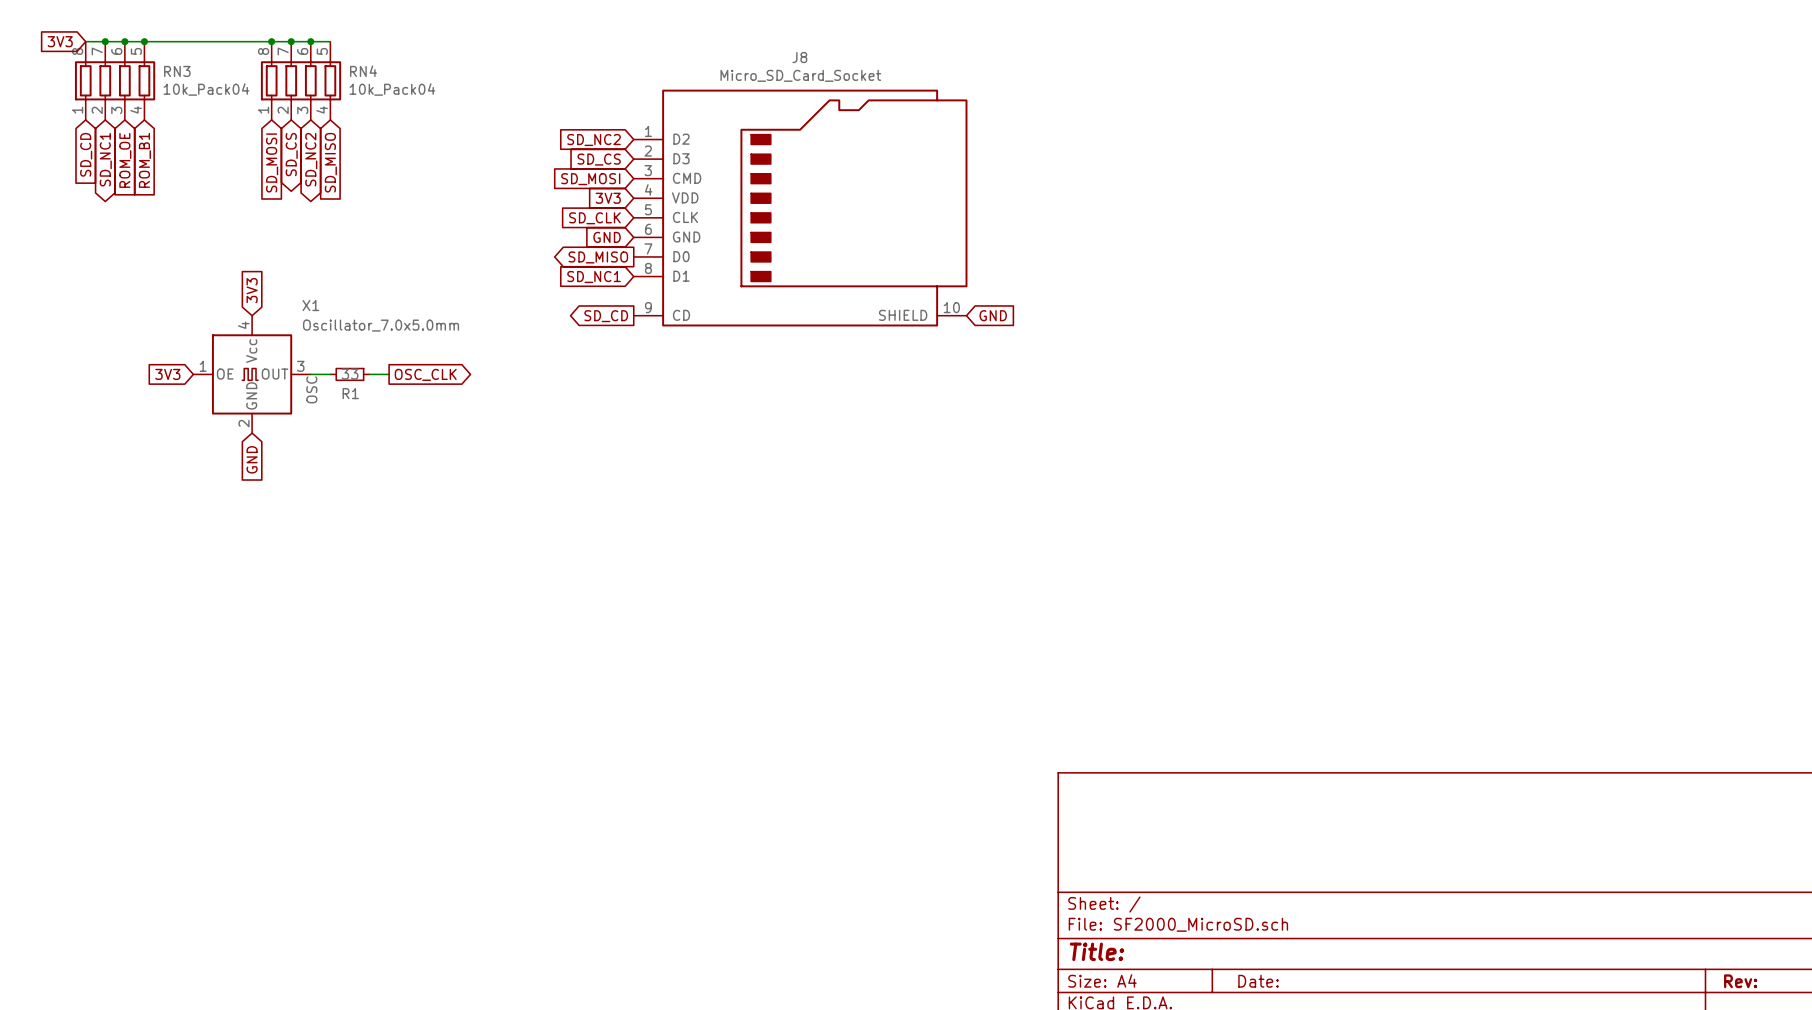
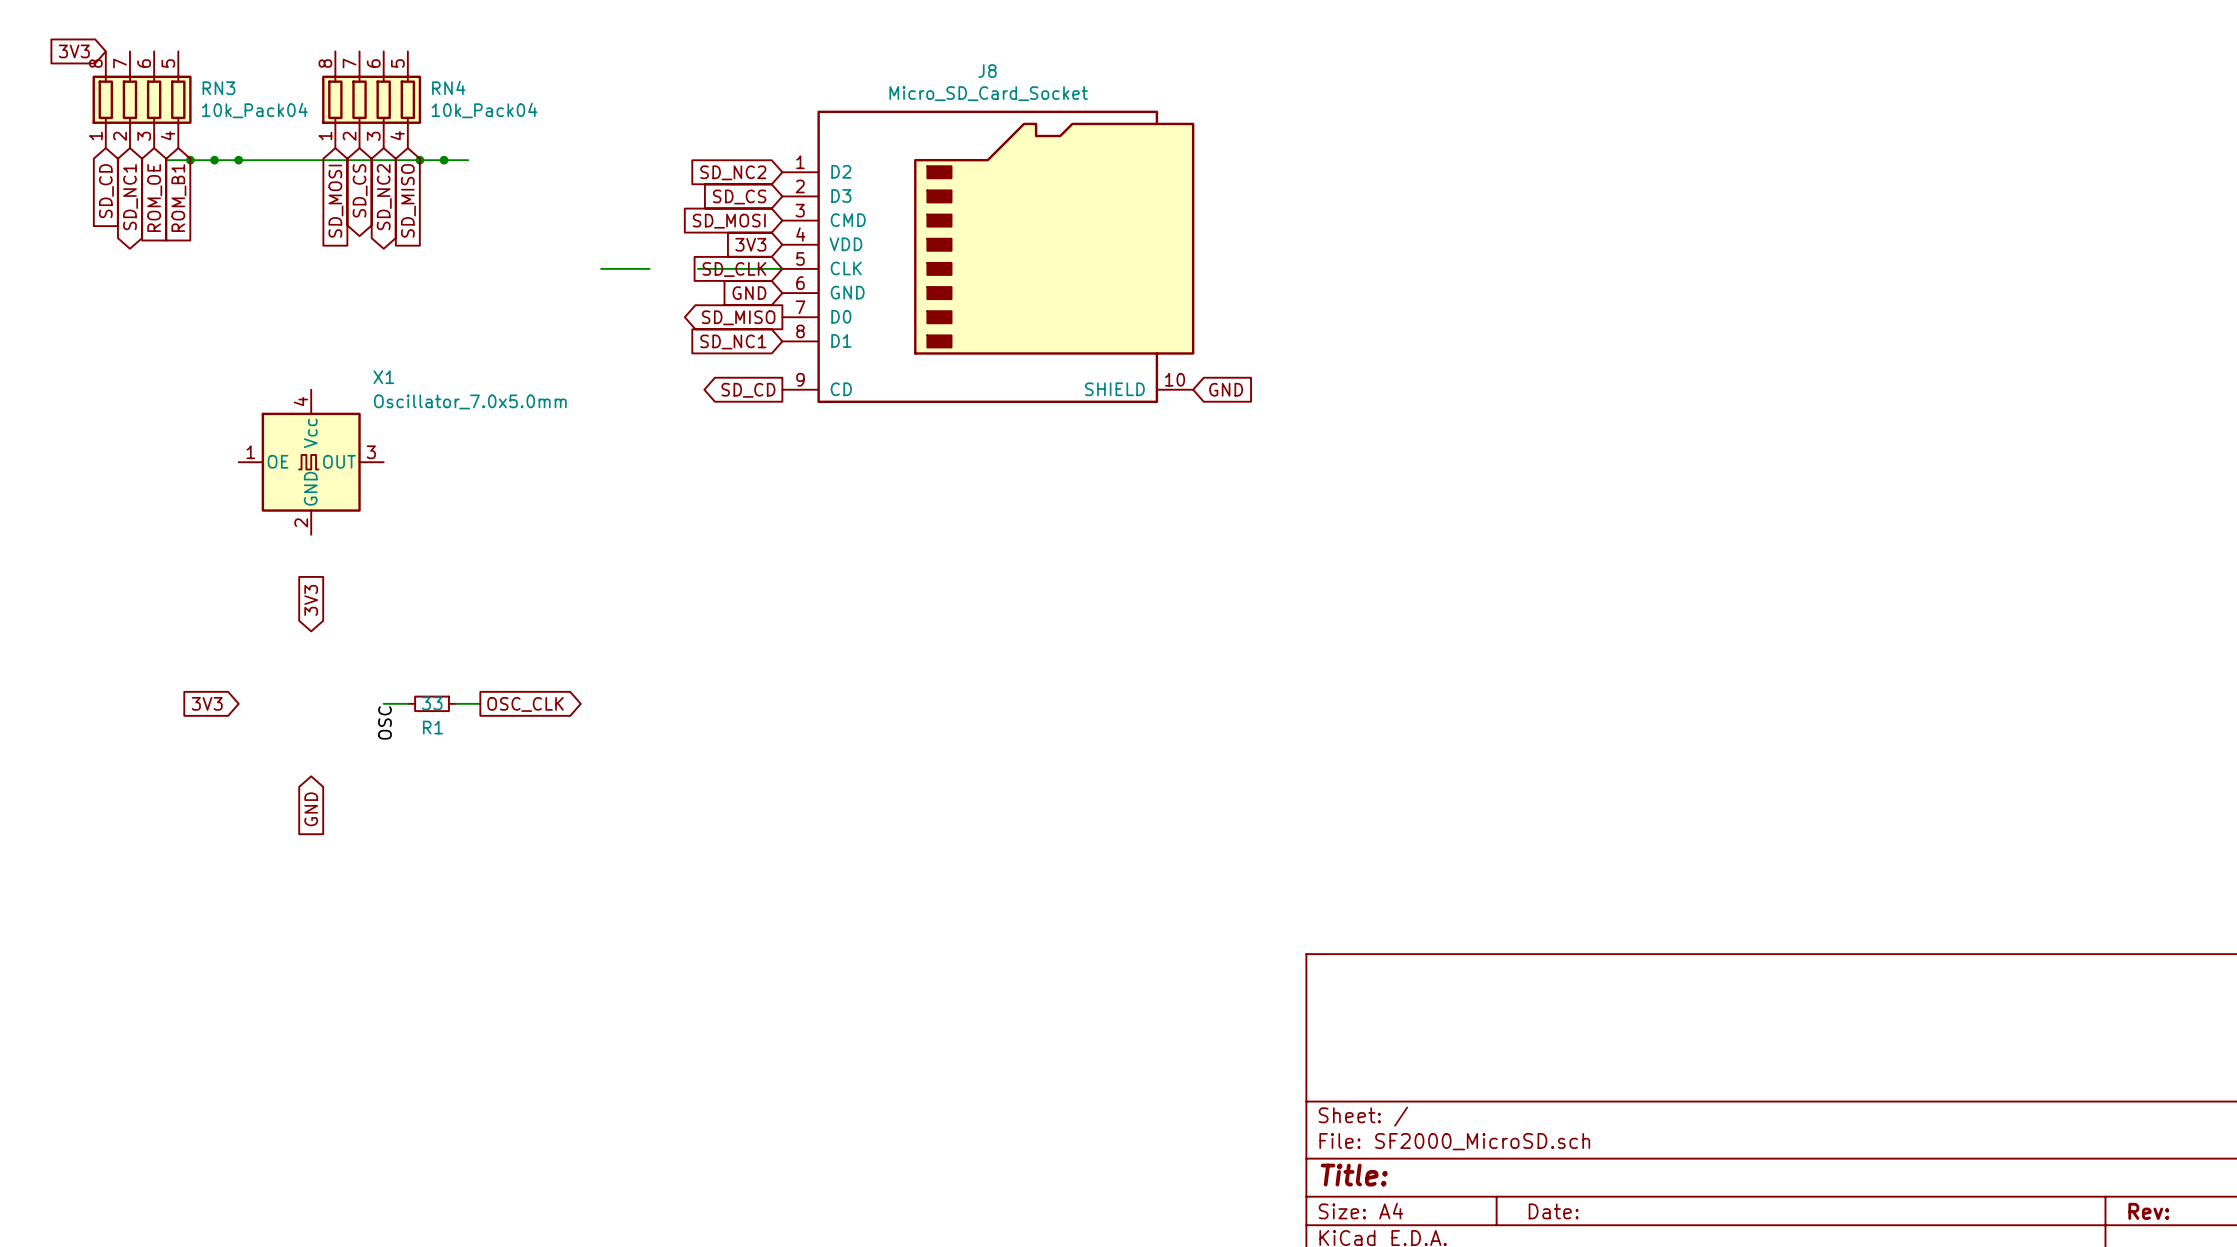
wire: (85, 41) (330, 41) -> (166, 160) (468, 160)
junction: (105, 41) -> none
junction: (124, 41) -> none
junction: (144, 41) -> none
junction: (271, 41) -> none
junction: (291, 41) -> none
junction: (310, 41) -> none
junction: none -> (190, 160)
junction: none -> (214, 160)
junction: none -> (238, 160)
junction: none -> (419, 160)
junction: none -> (444, 160)
wire: none -> (601, 268) (649, 268)
wire: none -> (697, 268) (782, 268)
global label: 3V3 (252, 290) -> none
global label: 3V3 (167, 374) -> none
wire: (310, 374) (330, 374) -> none
R1 position: (349, 374) -> (432, 703)
wire: (369, 374) (389, 374) -> none
global label: OSC_CLK (425, 374) -> none
label: OSC (311, 389) -> none
global label: GND (252, 459) -> none
global label: none -> 3V3 (311, 600)
global label: none -> 3V3 (207, 703)
wire: none -> (383, 703) (407, 703)
wire: none -> (456, 703) (480, 703)
global label: none -> OSC_CLK (525, 704)
label: none -> OSC (384, 722)
global label: none -> GND (311, 809)

